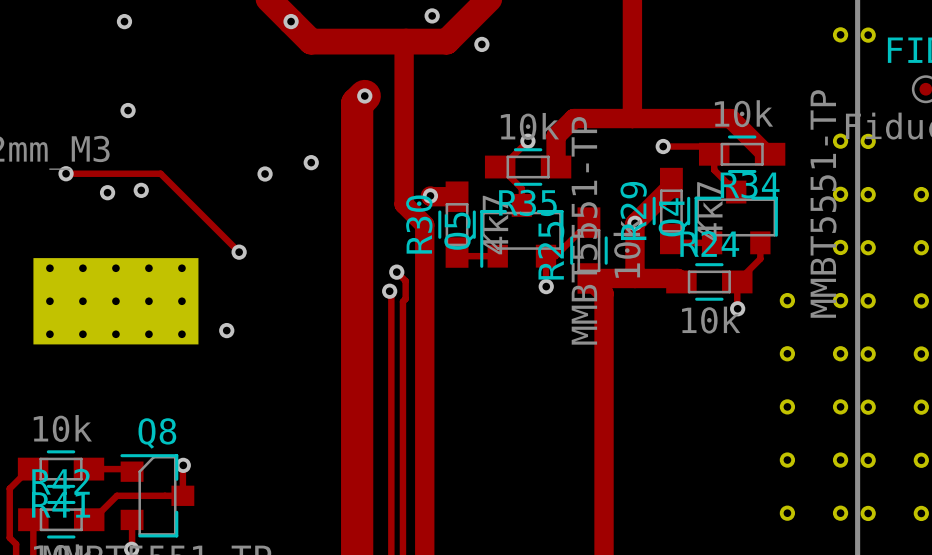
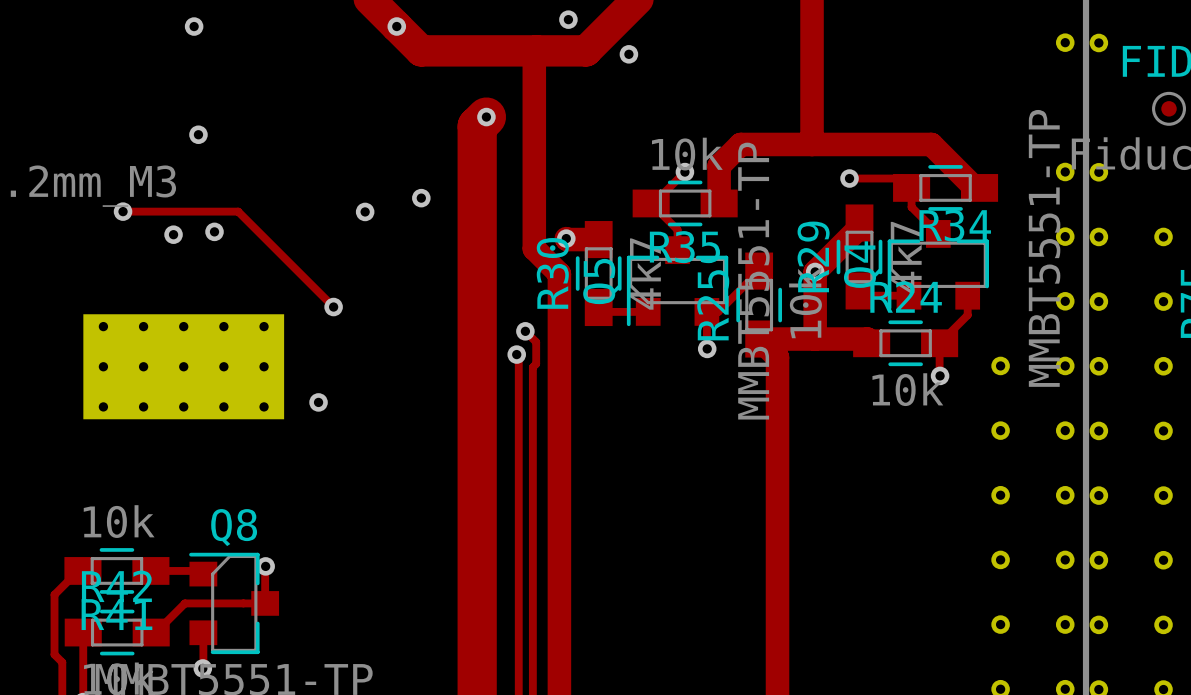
R34 value: 10k (743, 113) -> none

